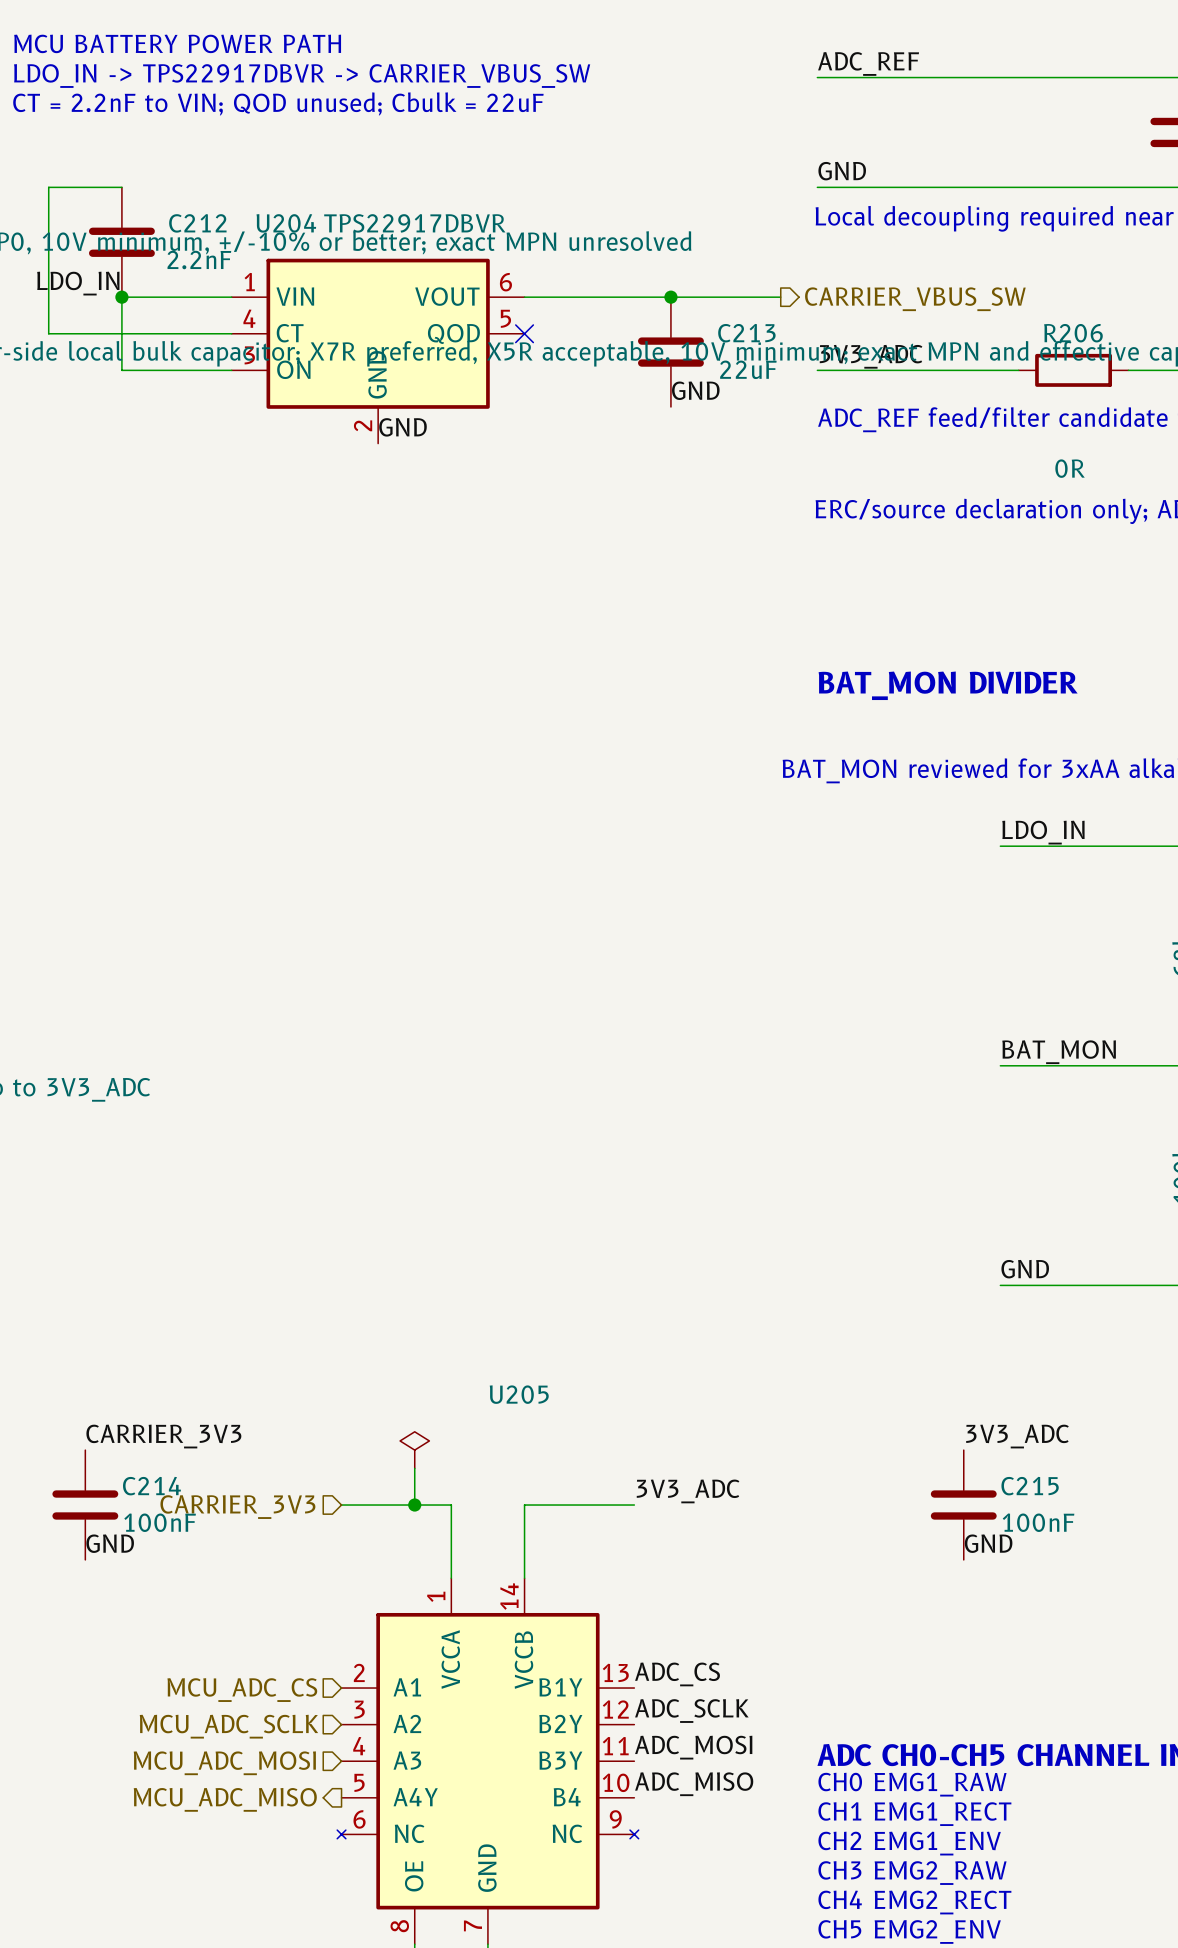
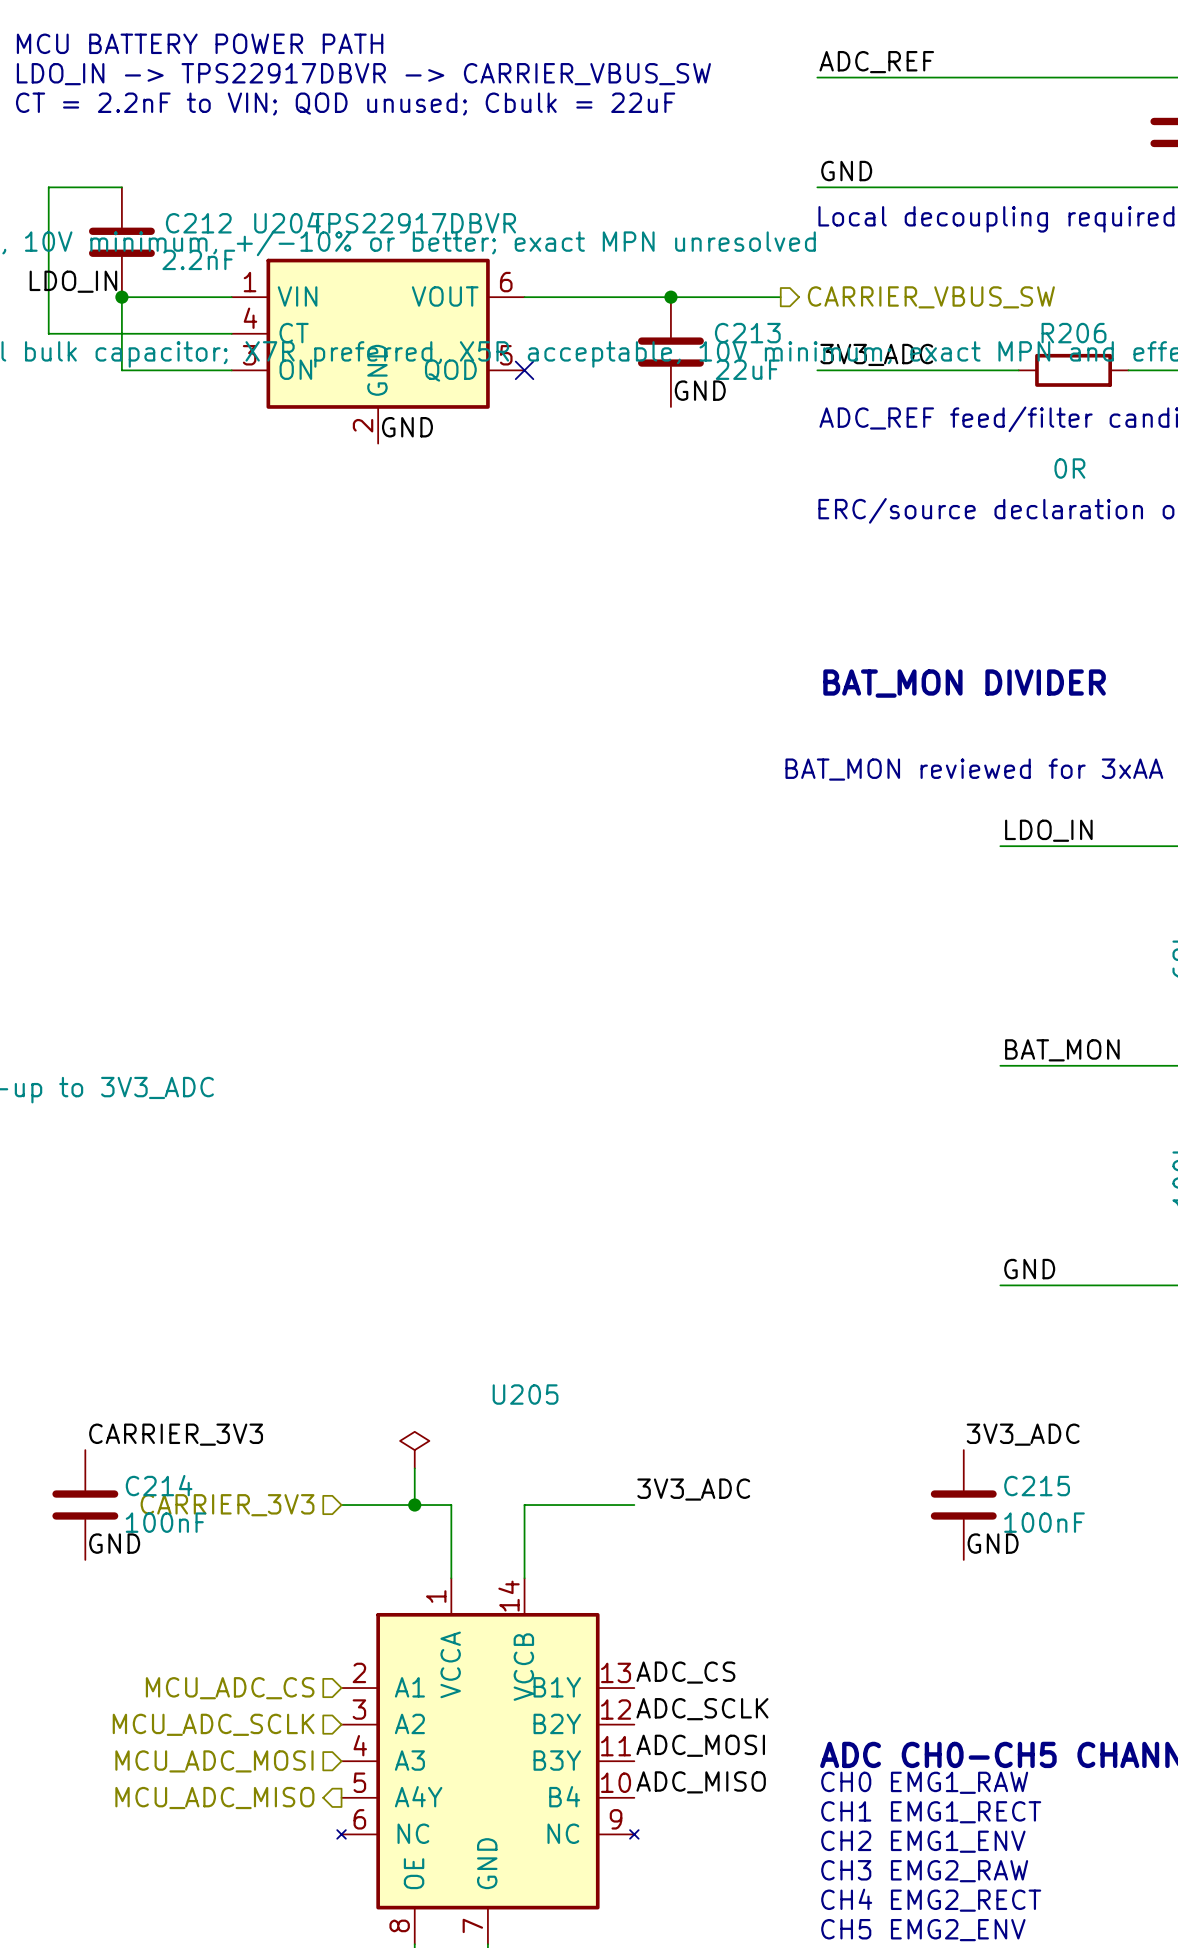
U204 symbol: [231, 258, 525, 444] -> [231, 258, 525, 444]
no-connect mark position: (524, 333) -> (524, 370)

